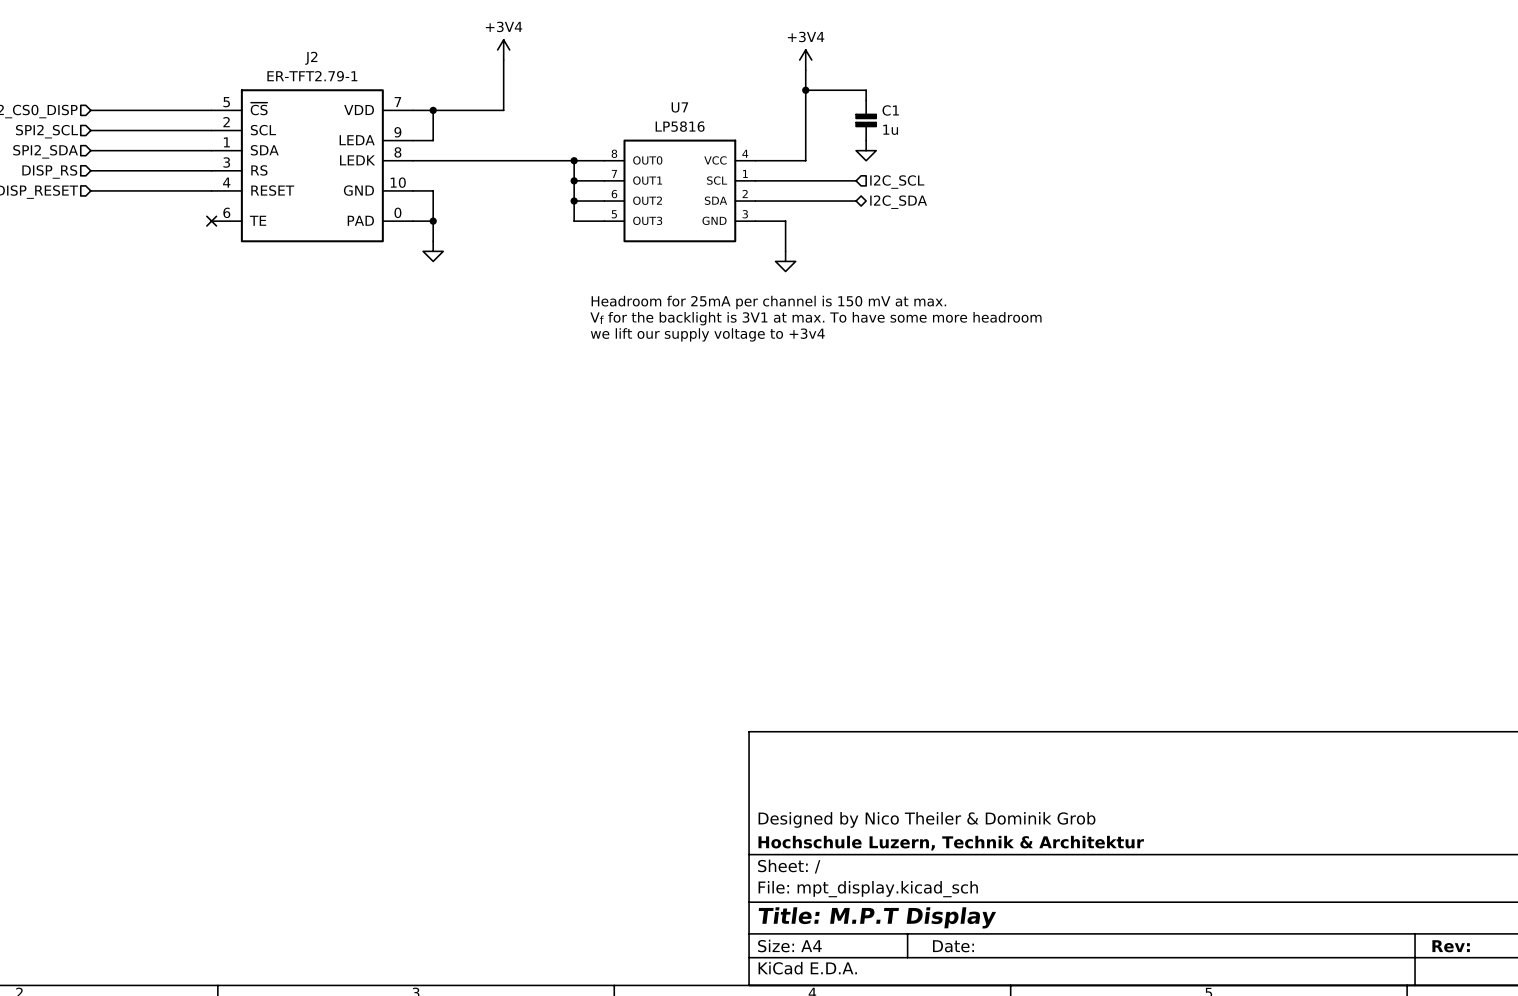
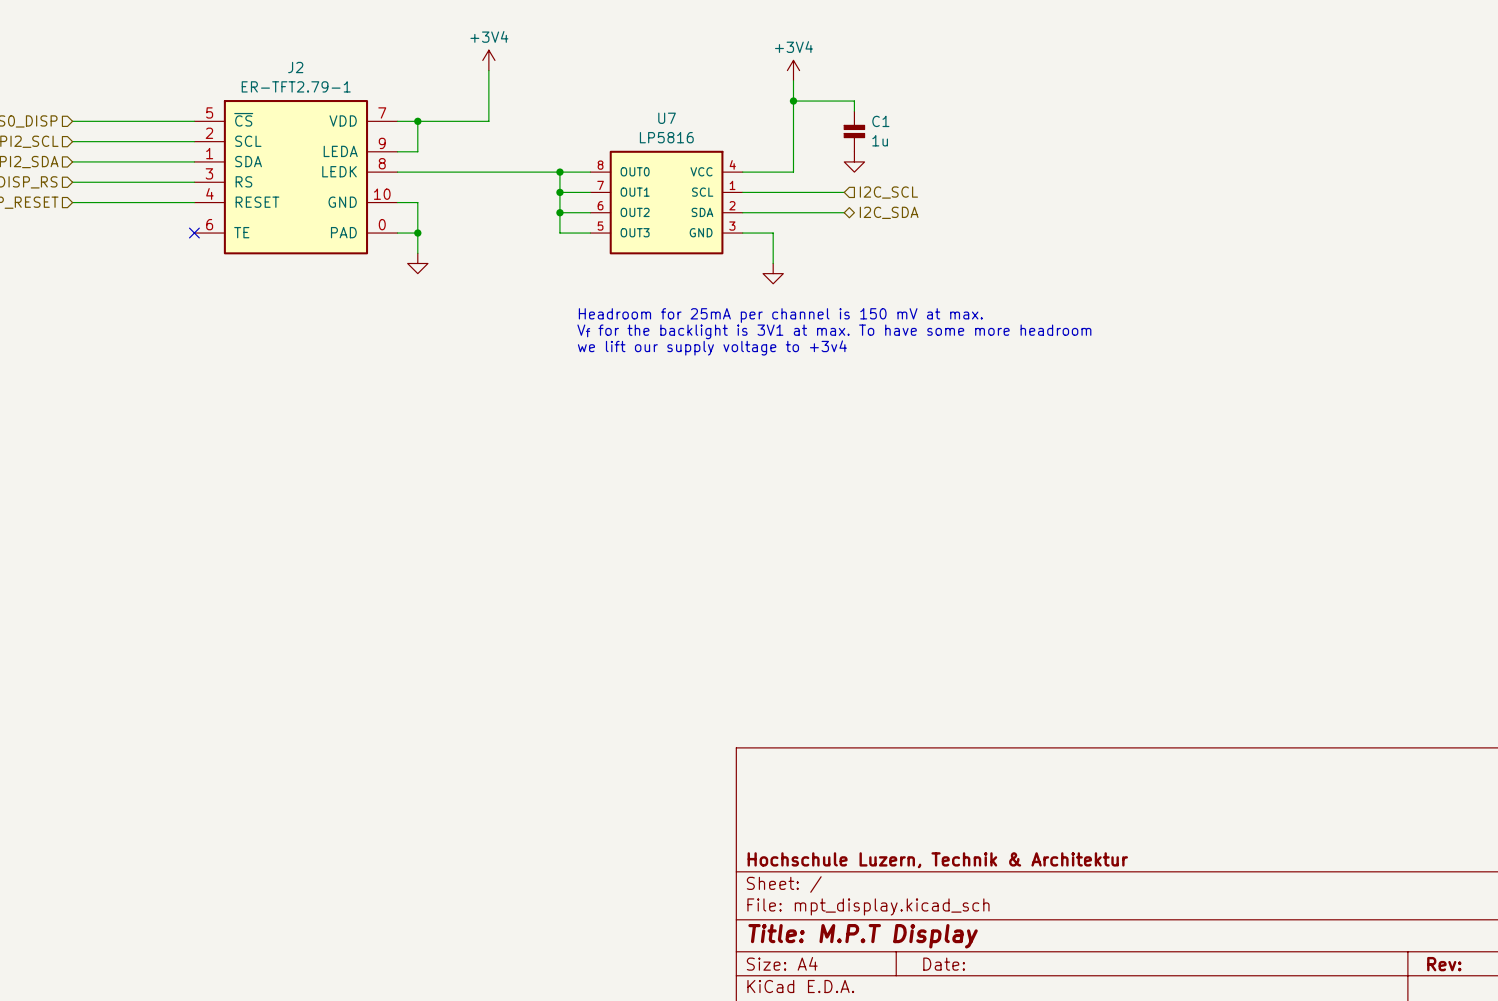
title block: Designed by Nico Theiler & Dominik Grob (927, 819) -> none

